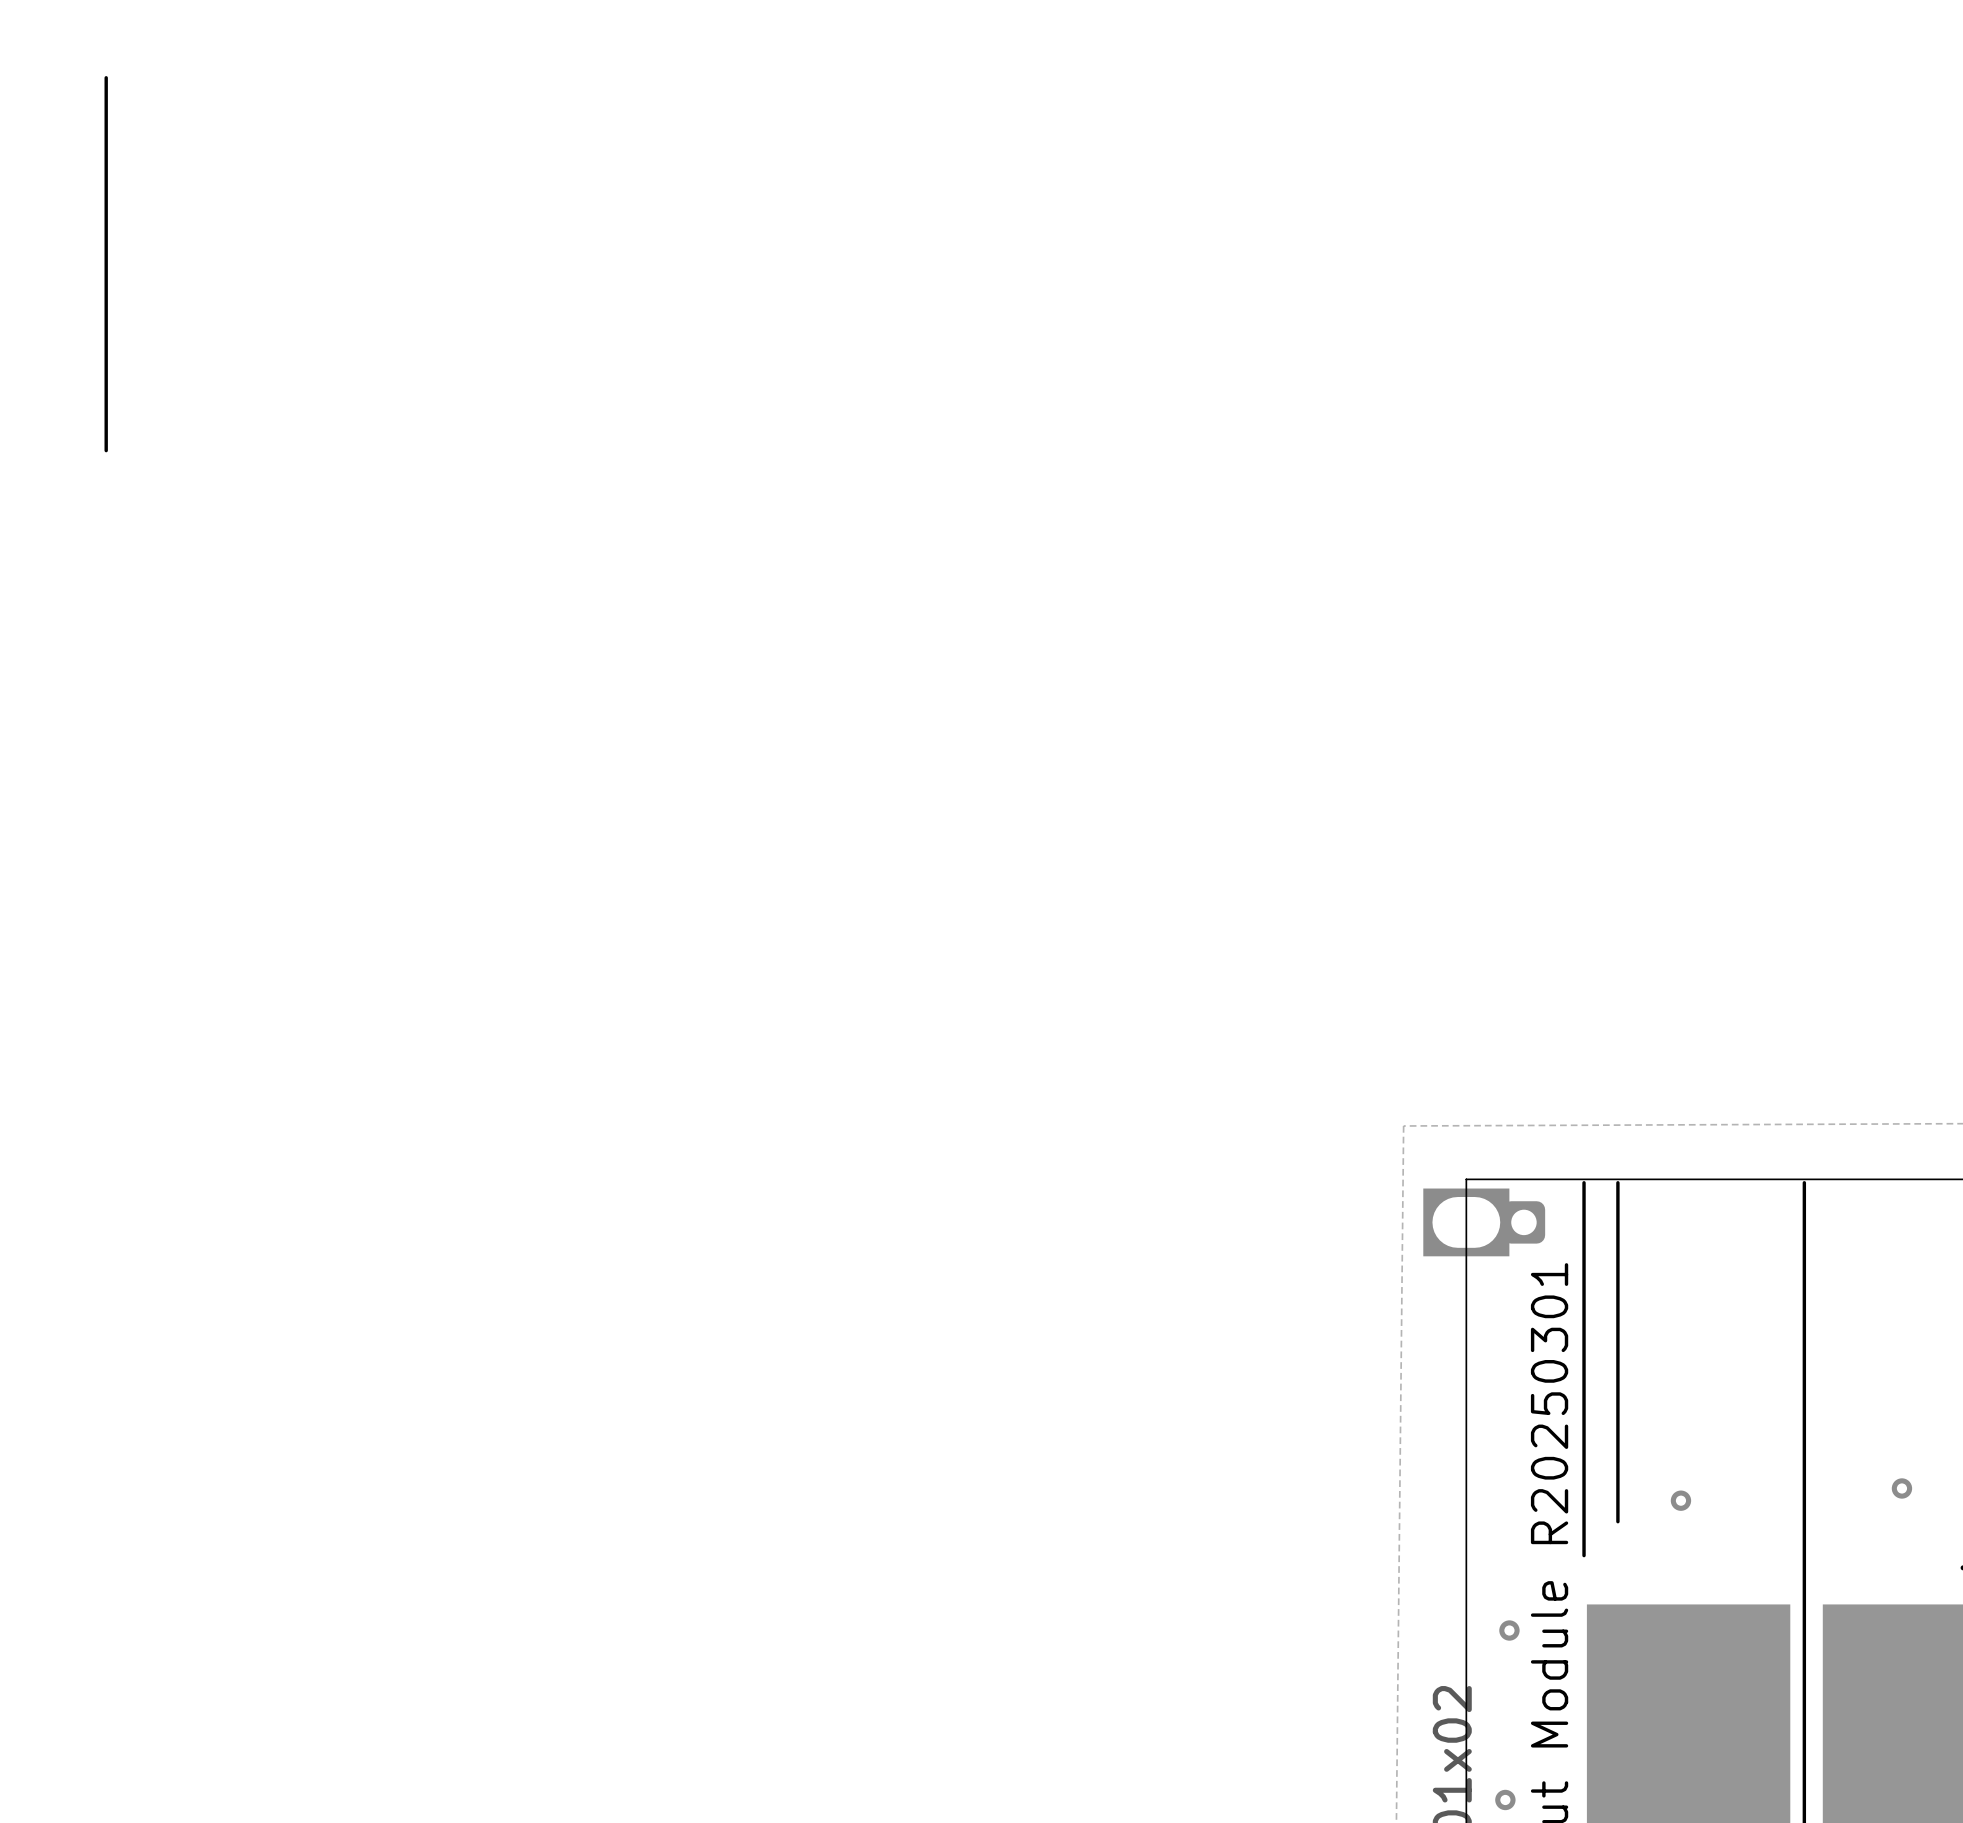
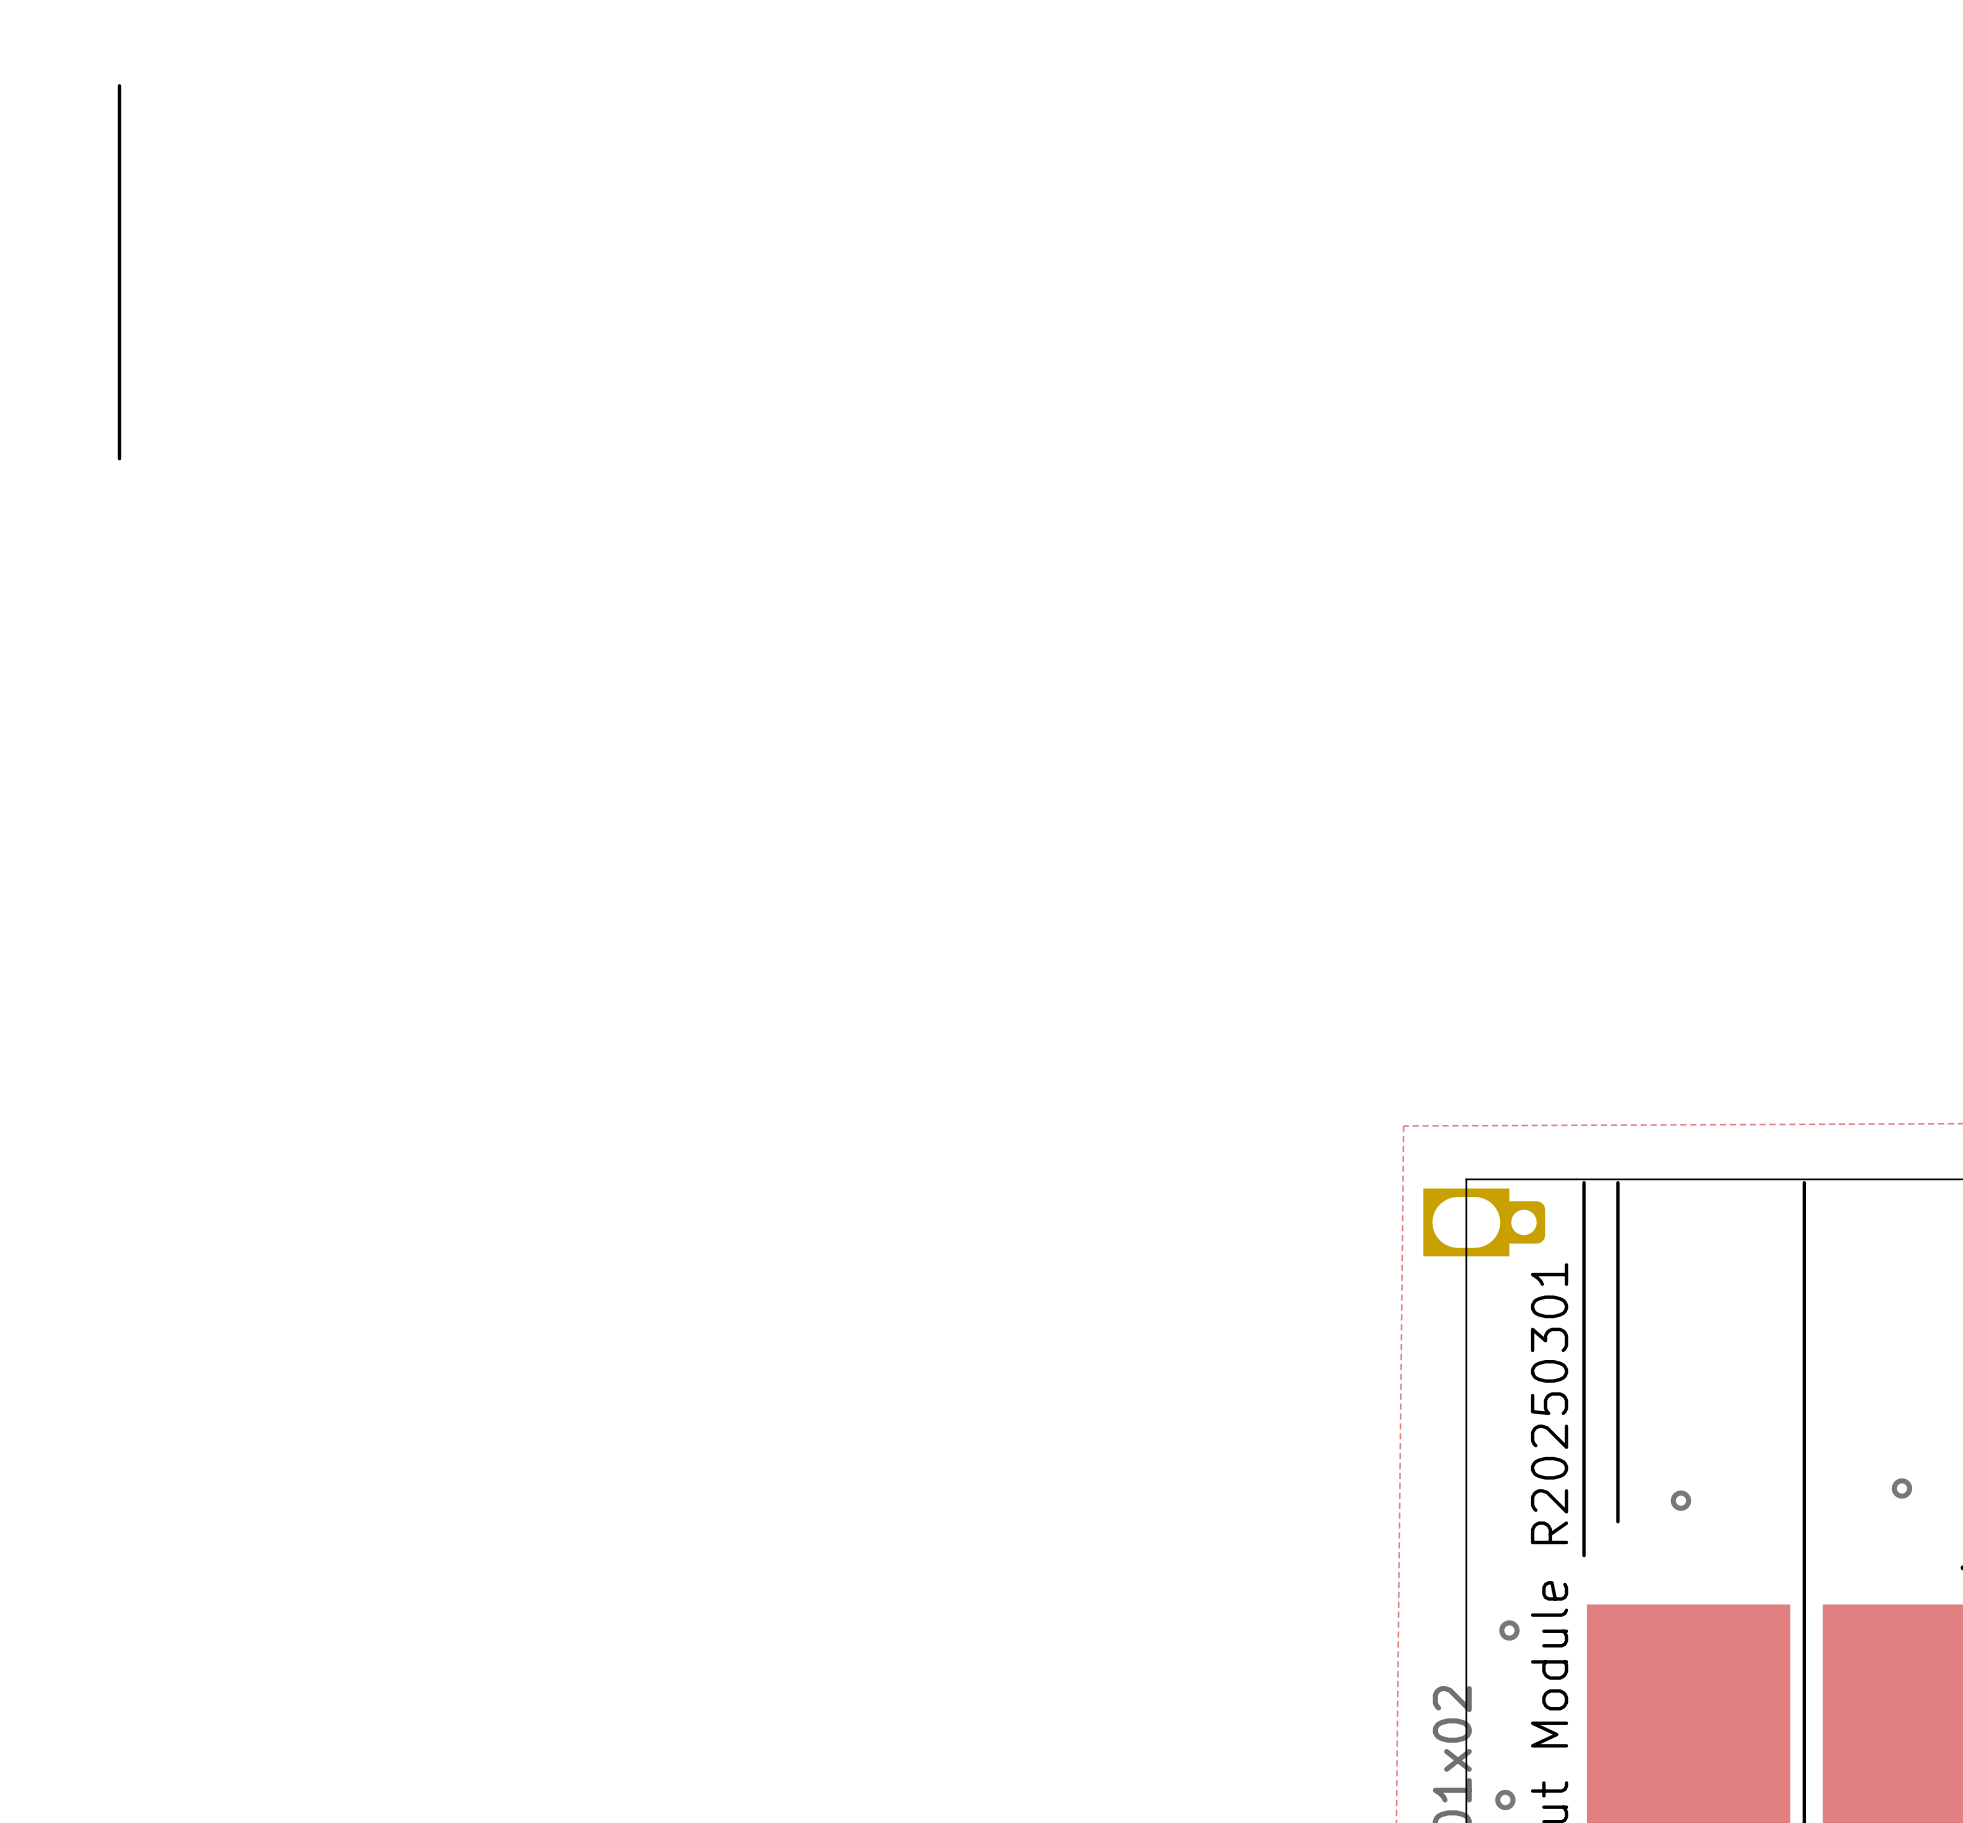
line: (106, 77) (106, 450) -> (119, 85) (119, 458)

